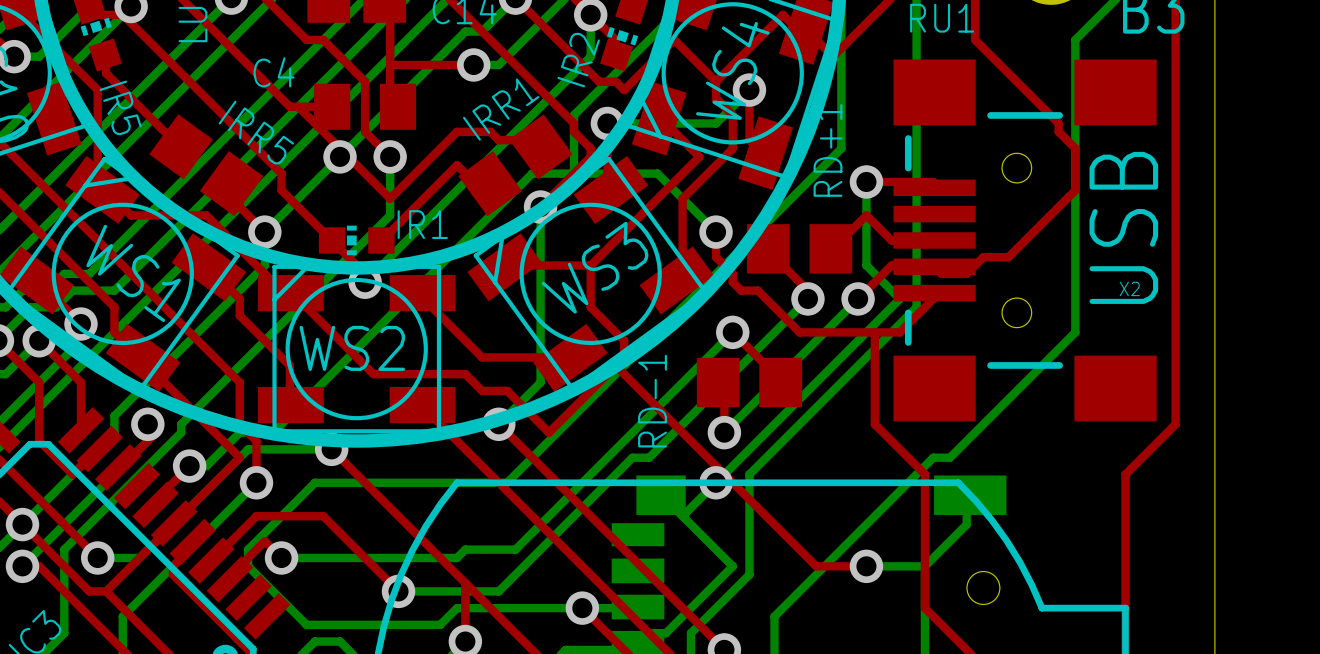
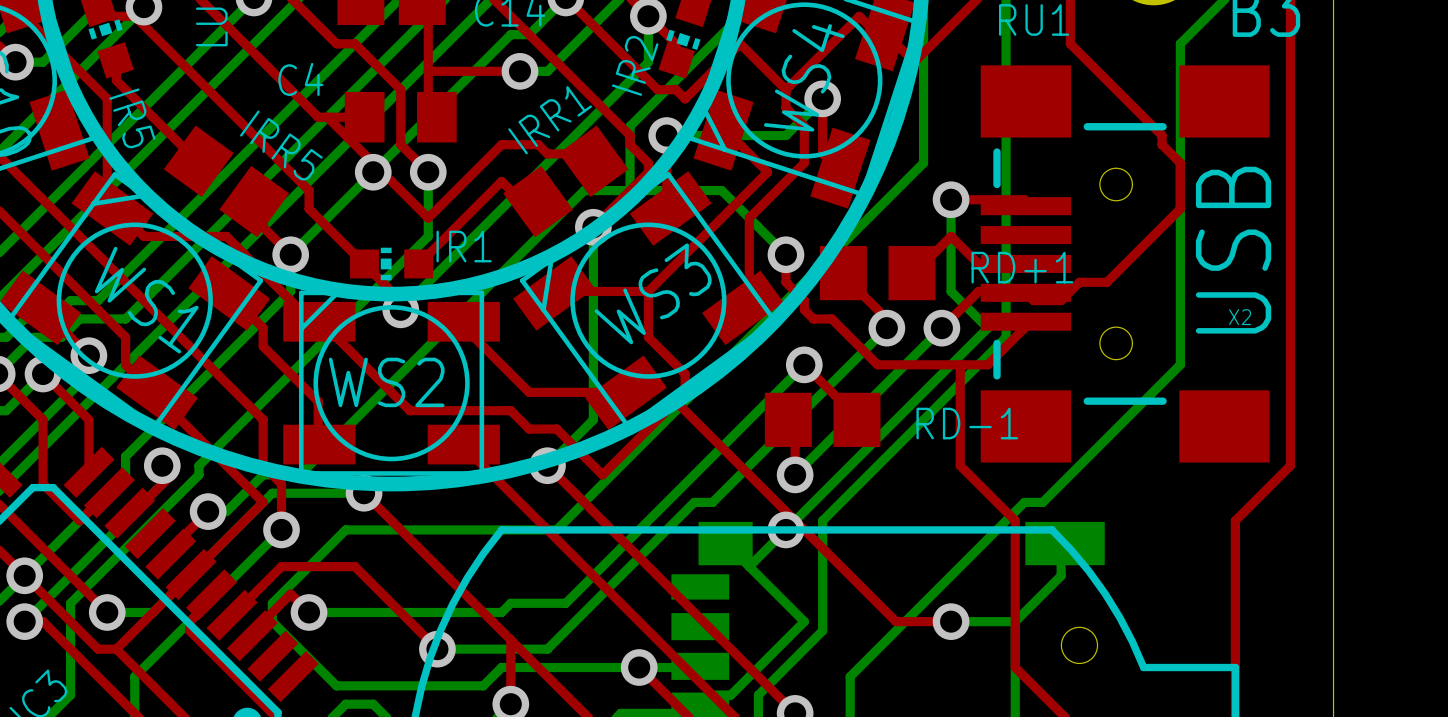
RD+1 name rotation: 0° (828, 150) -> 90° clockwise (1022, 267)
RD+1 name position: RD+1 (828, 150) -> RD+1 (1022, 267)
RD-1 name rotation: 0° (652, 401) -> 90° clockwise (967, 423)
RD-1 name position: RD-1 (652, 401) -> RD-1 (967, 423)

